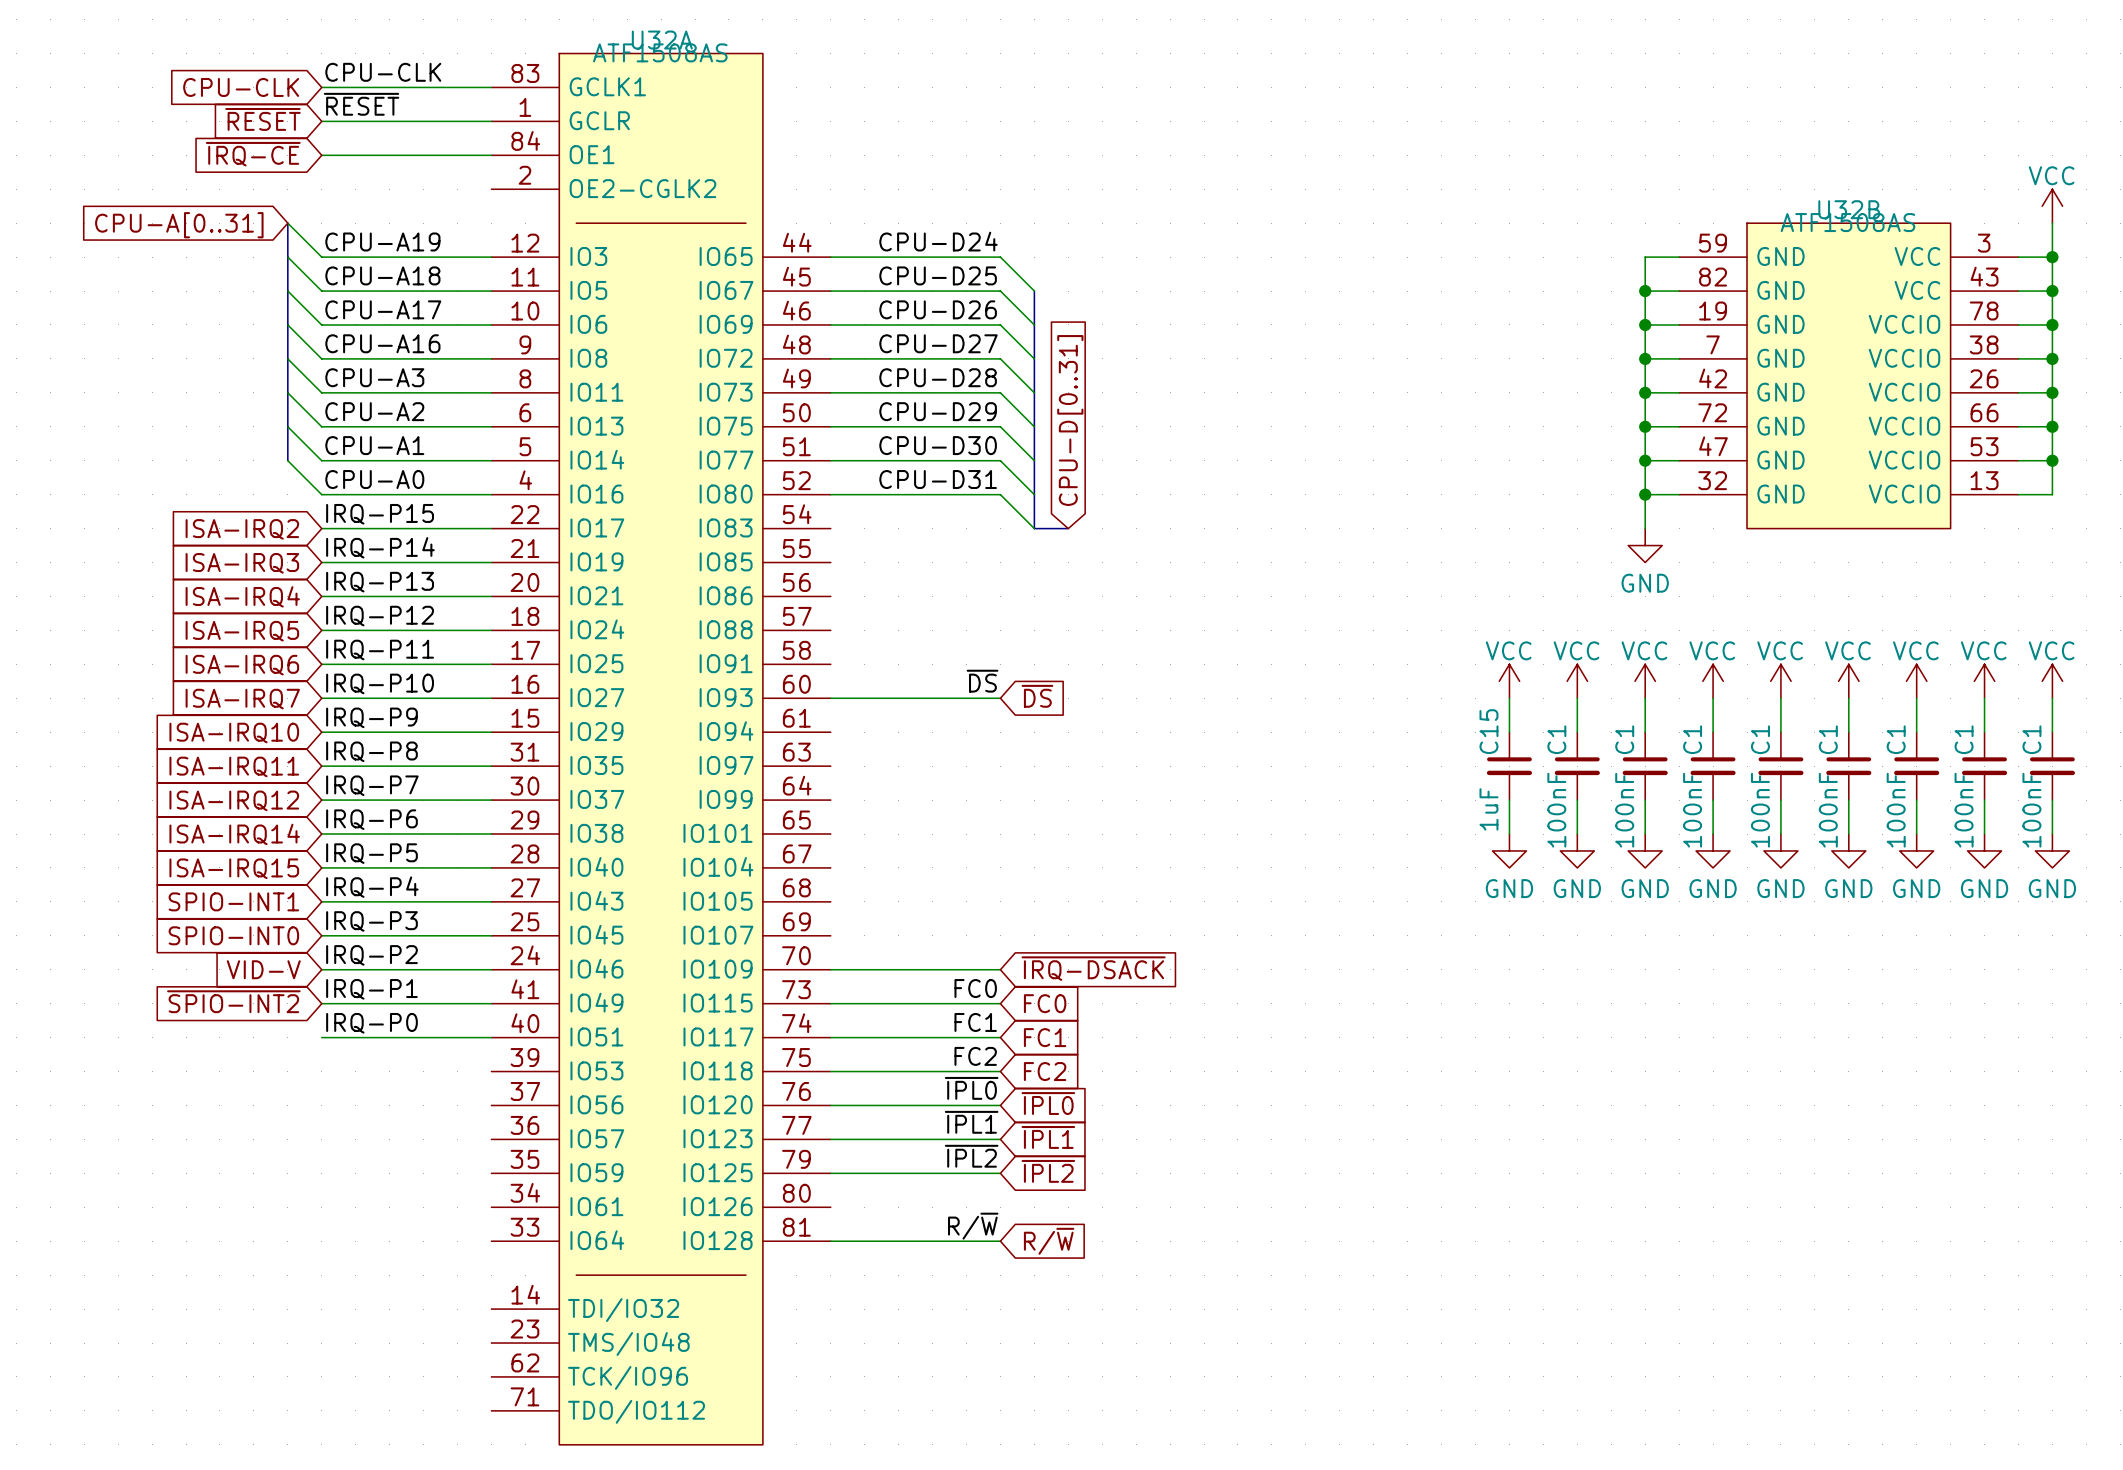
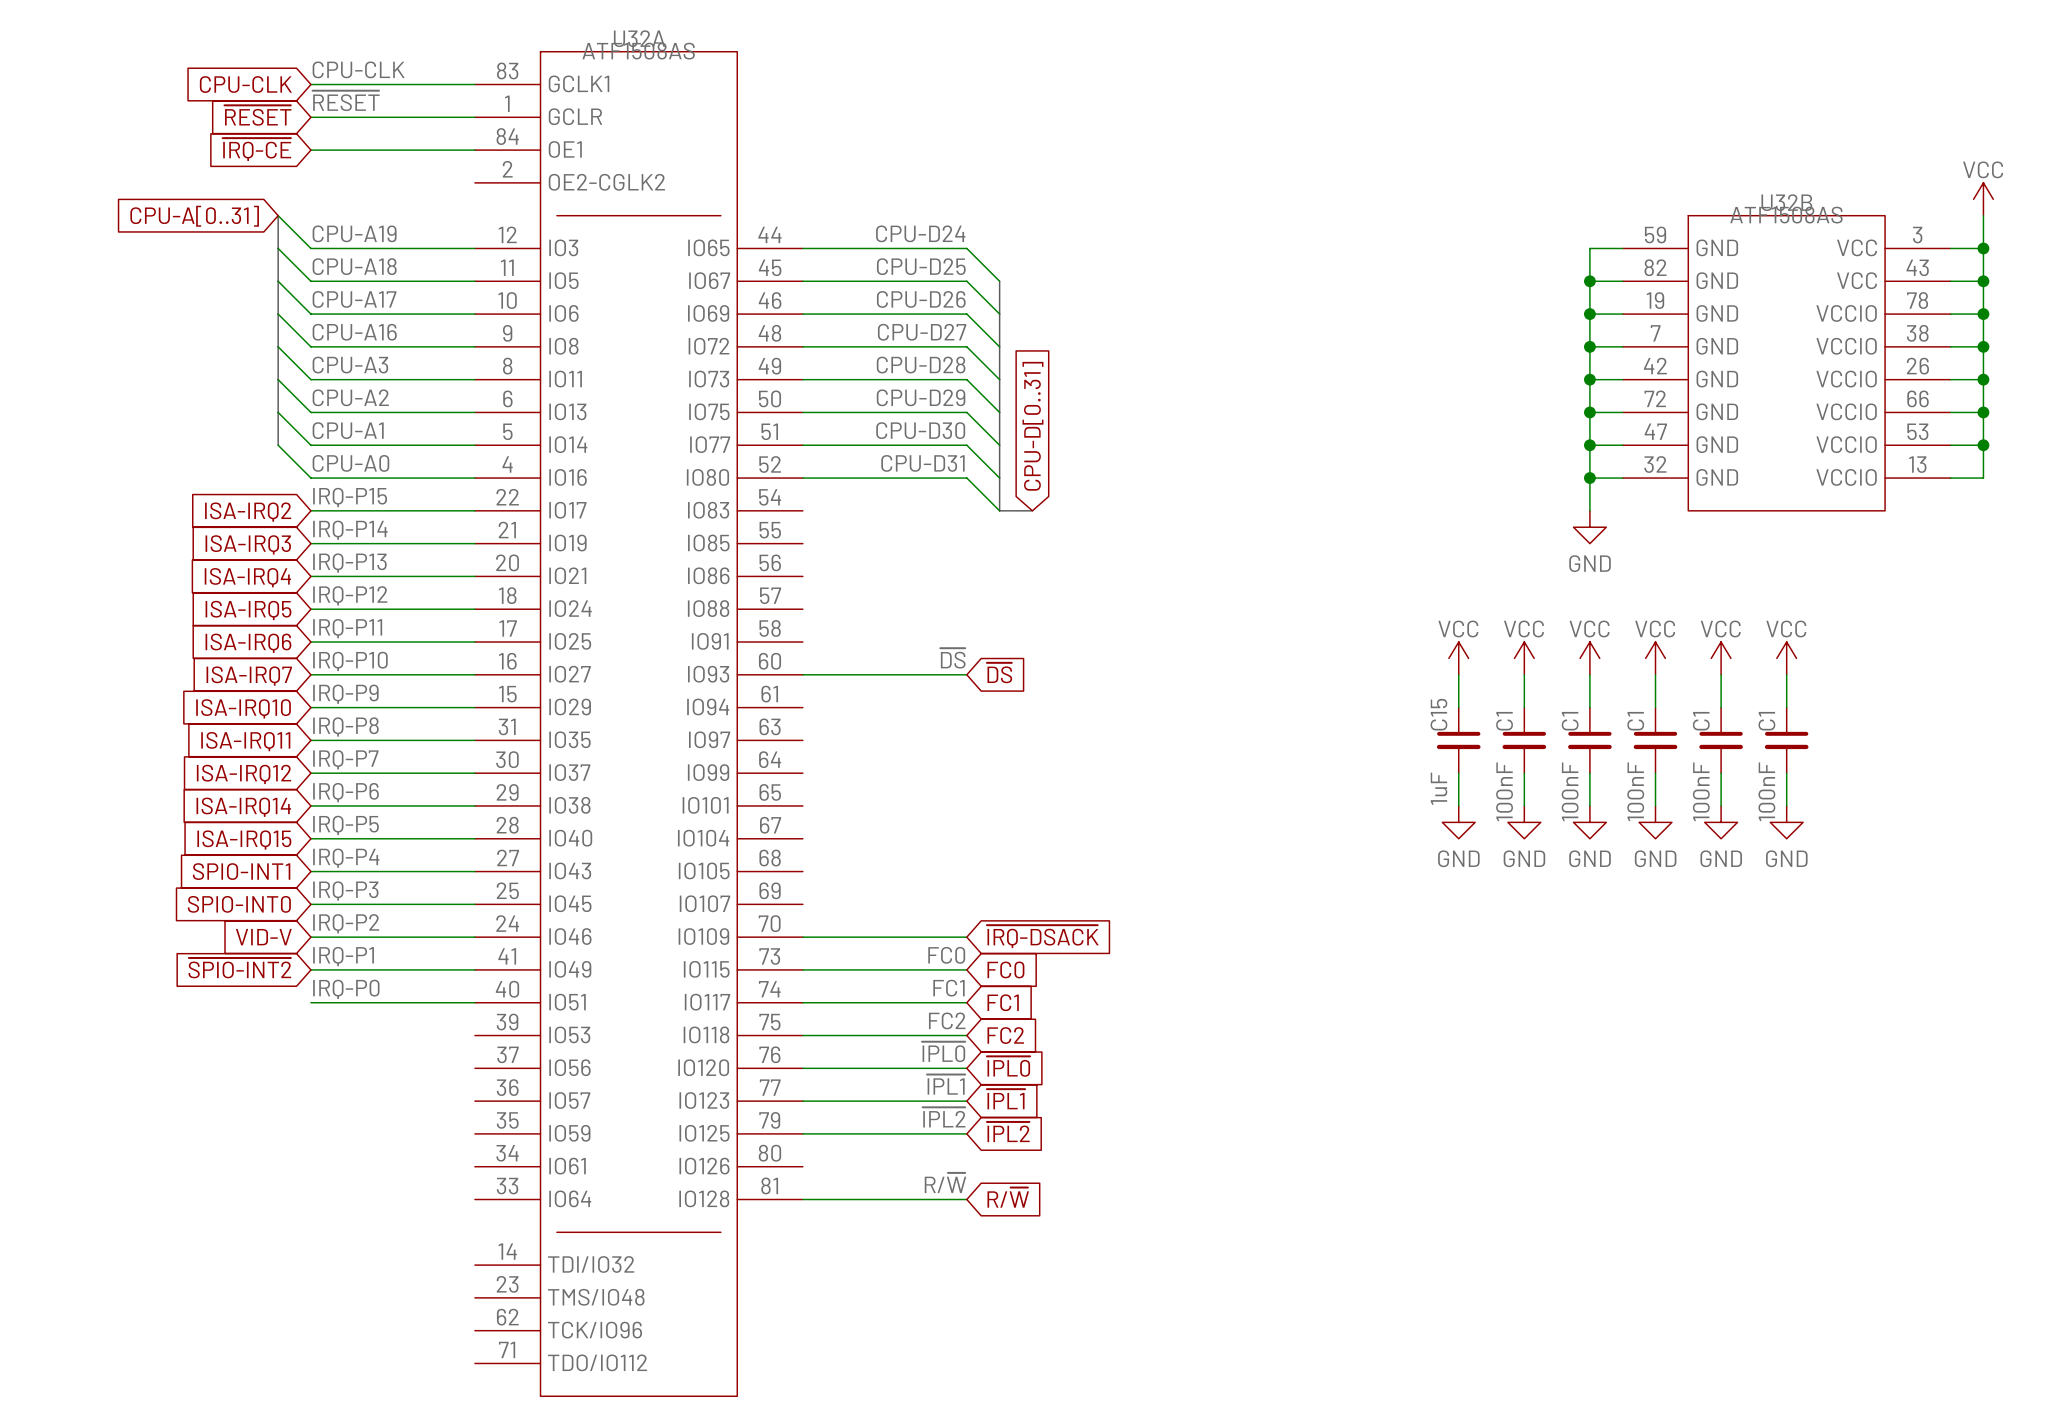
power symbol: VCC (1916, 681) -> none
power symbol: VCC (1984, 681) -> none
power symbol: VCC (2052, 681) -> none
wire: (1916, 698) (1916, 732) -> none
wire: (1984, 698) (1984, 732) -> none
wire: (2052, 698) (2052, 732) -> none
C1: 100nF (1916, 766) -> none
C1: 100nF (1984, 766) -> none
C1: 100nF (2052, 766) -> none
wire: (1916, 800) (1916, 834) -> none
wire: (1984, 800) (1984, 834) -> none
wire: (2052, 800) (2052, 834) -> none
power symbol: GND (1916, 850) -> none
power symbol: GND (1984, 850) -> none
power symbol: GND (2052, 850) -> none

